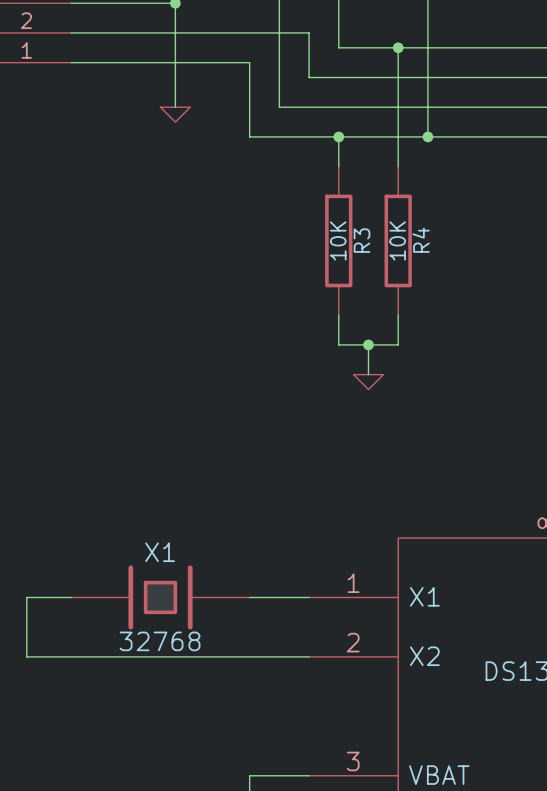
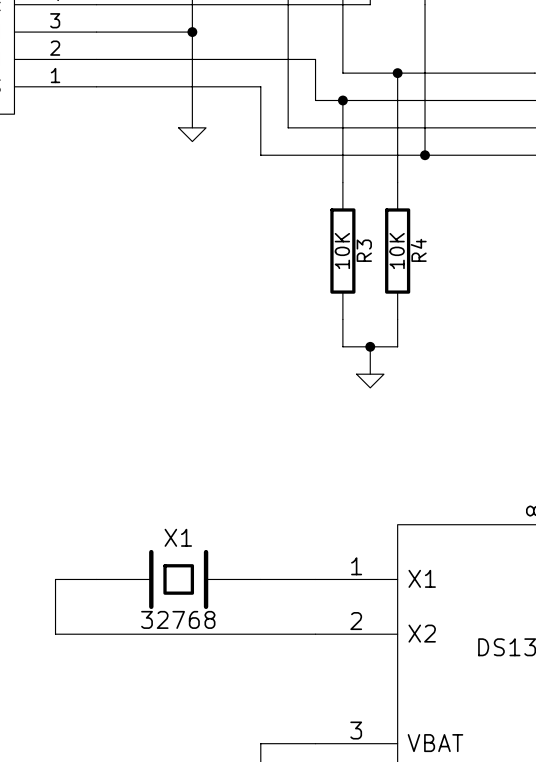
wire: none -> (342, 100) (342, 155)
junction position: (338, 136) -> (342, 100)

